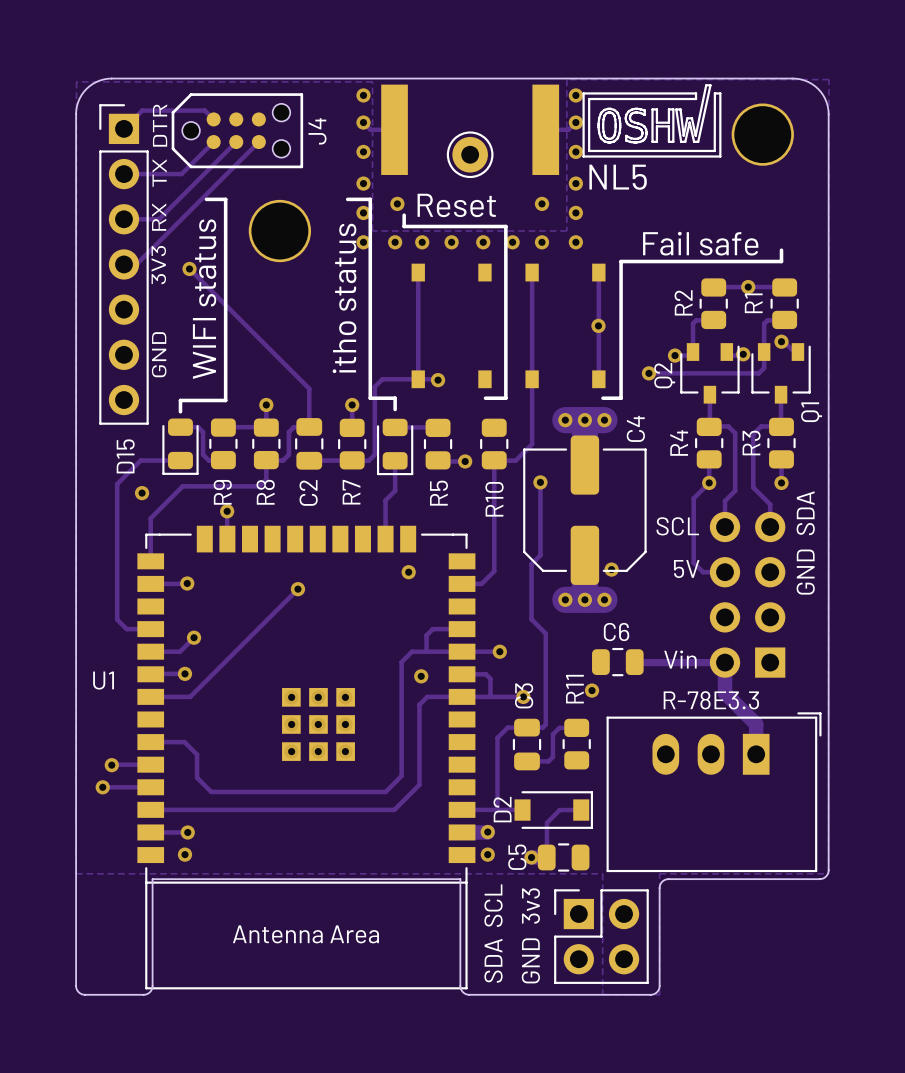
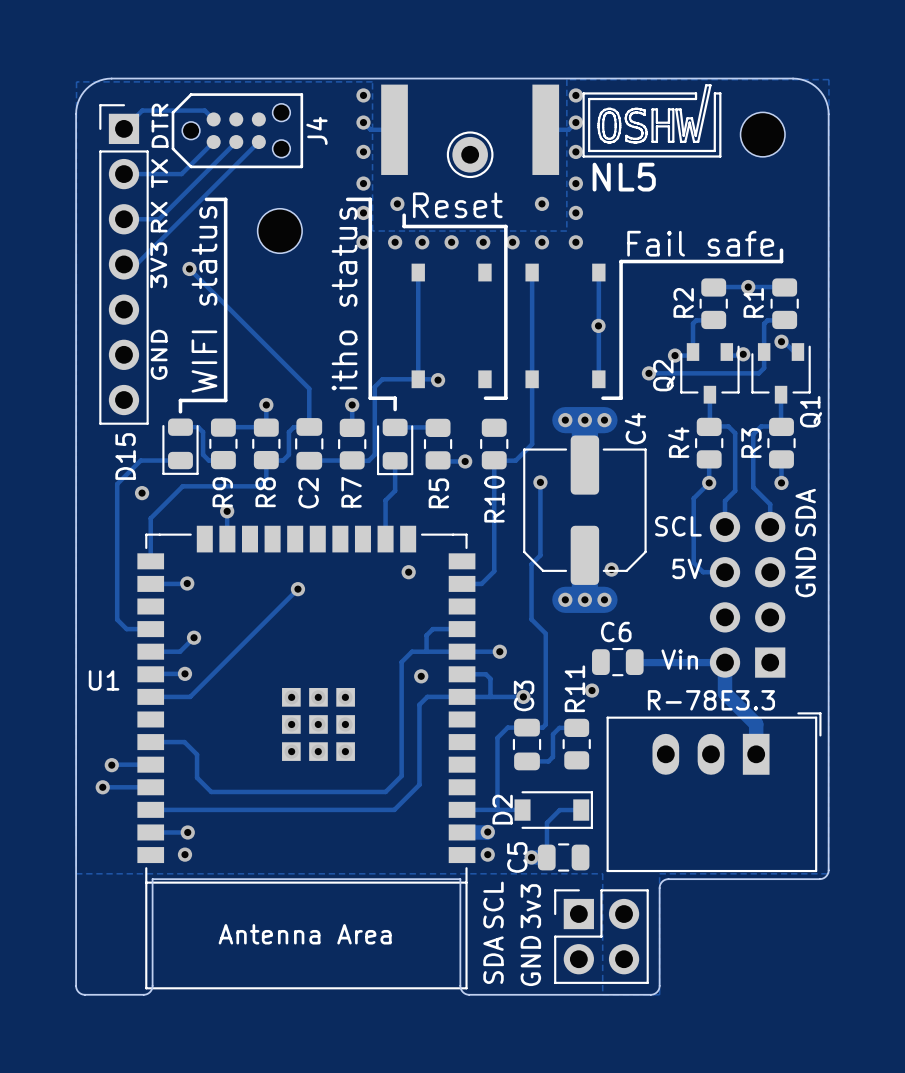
part footprint: [731, 103, 794, 166] -> [740, 112, 786, 157]
part footprint: [248, 199, 312, 263] -> [257, 208, 303, 254]

